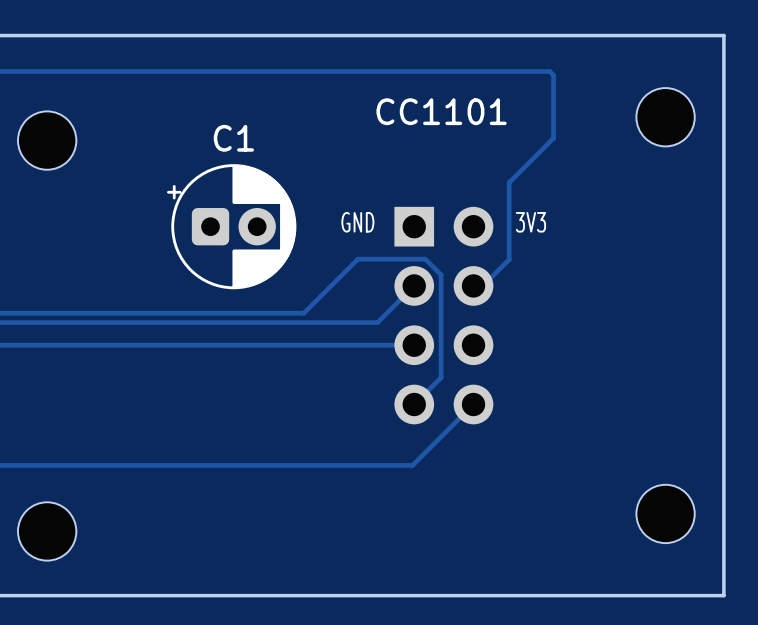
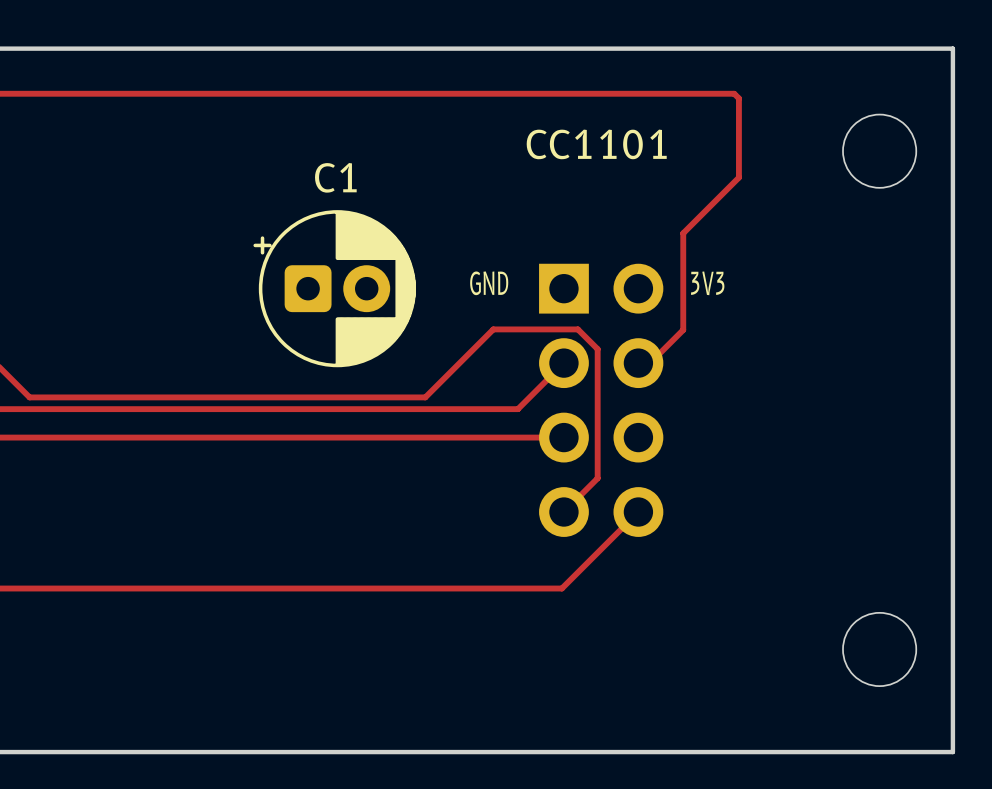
part: (47, 140) -> none
part: (47, 531) -> none

